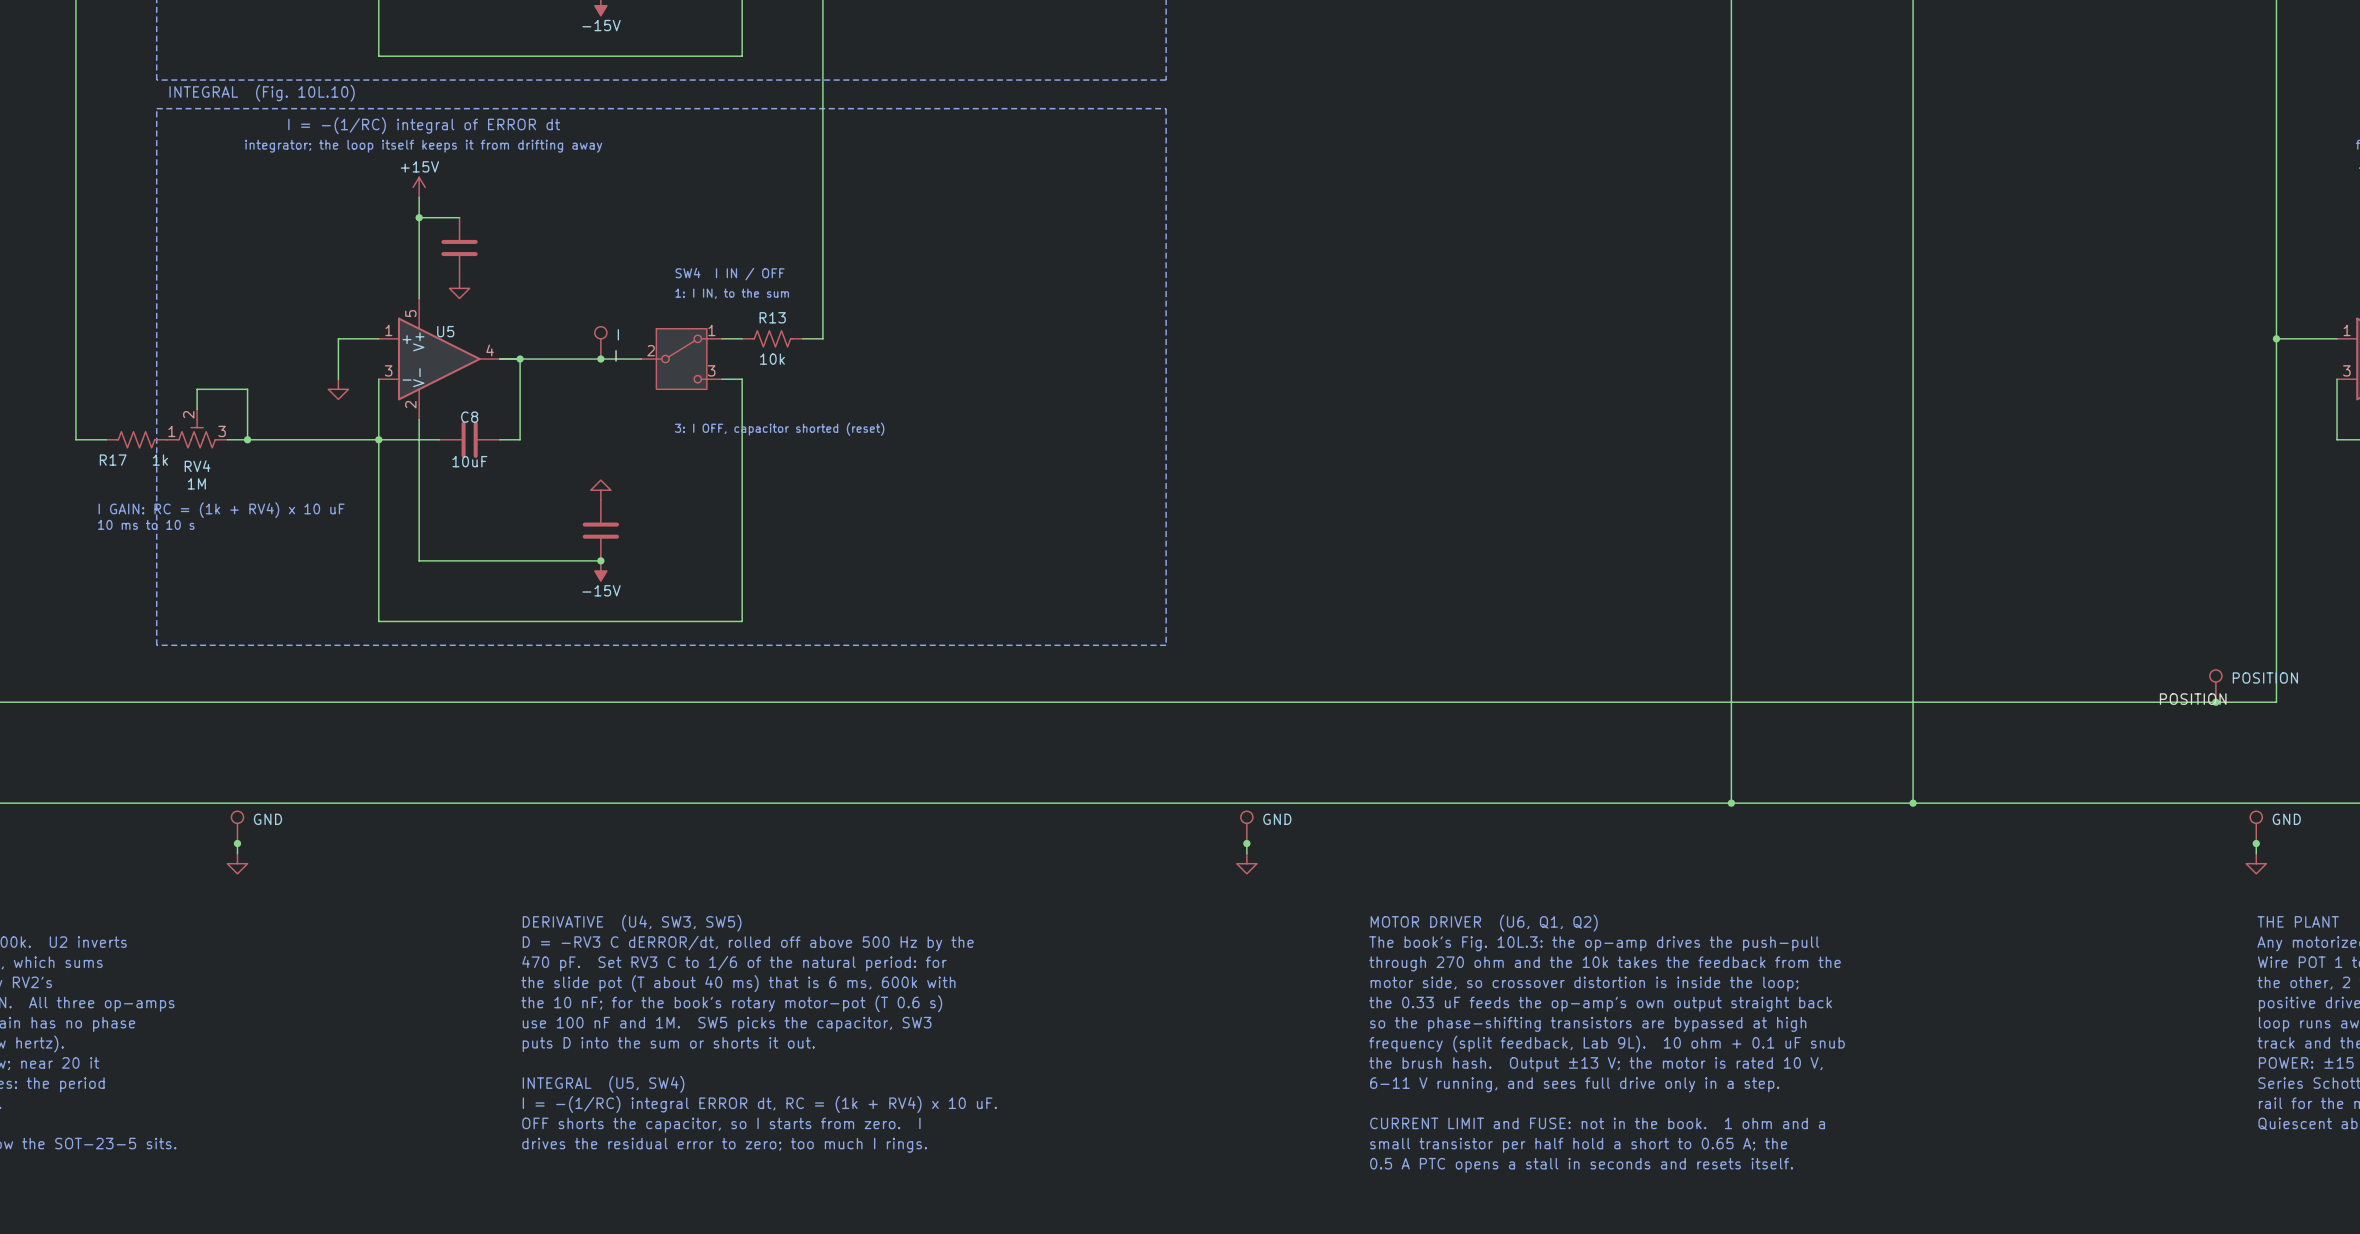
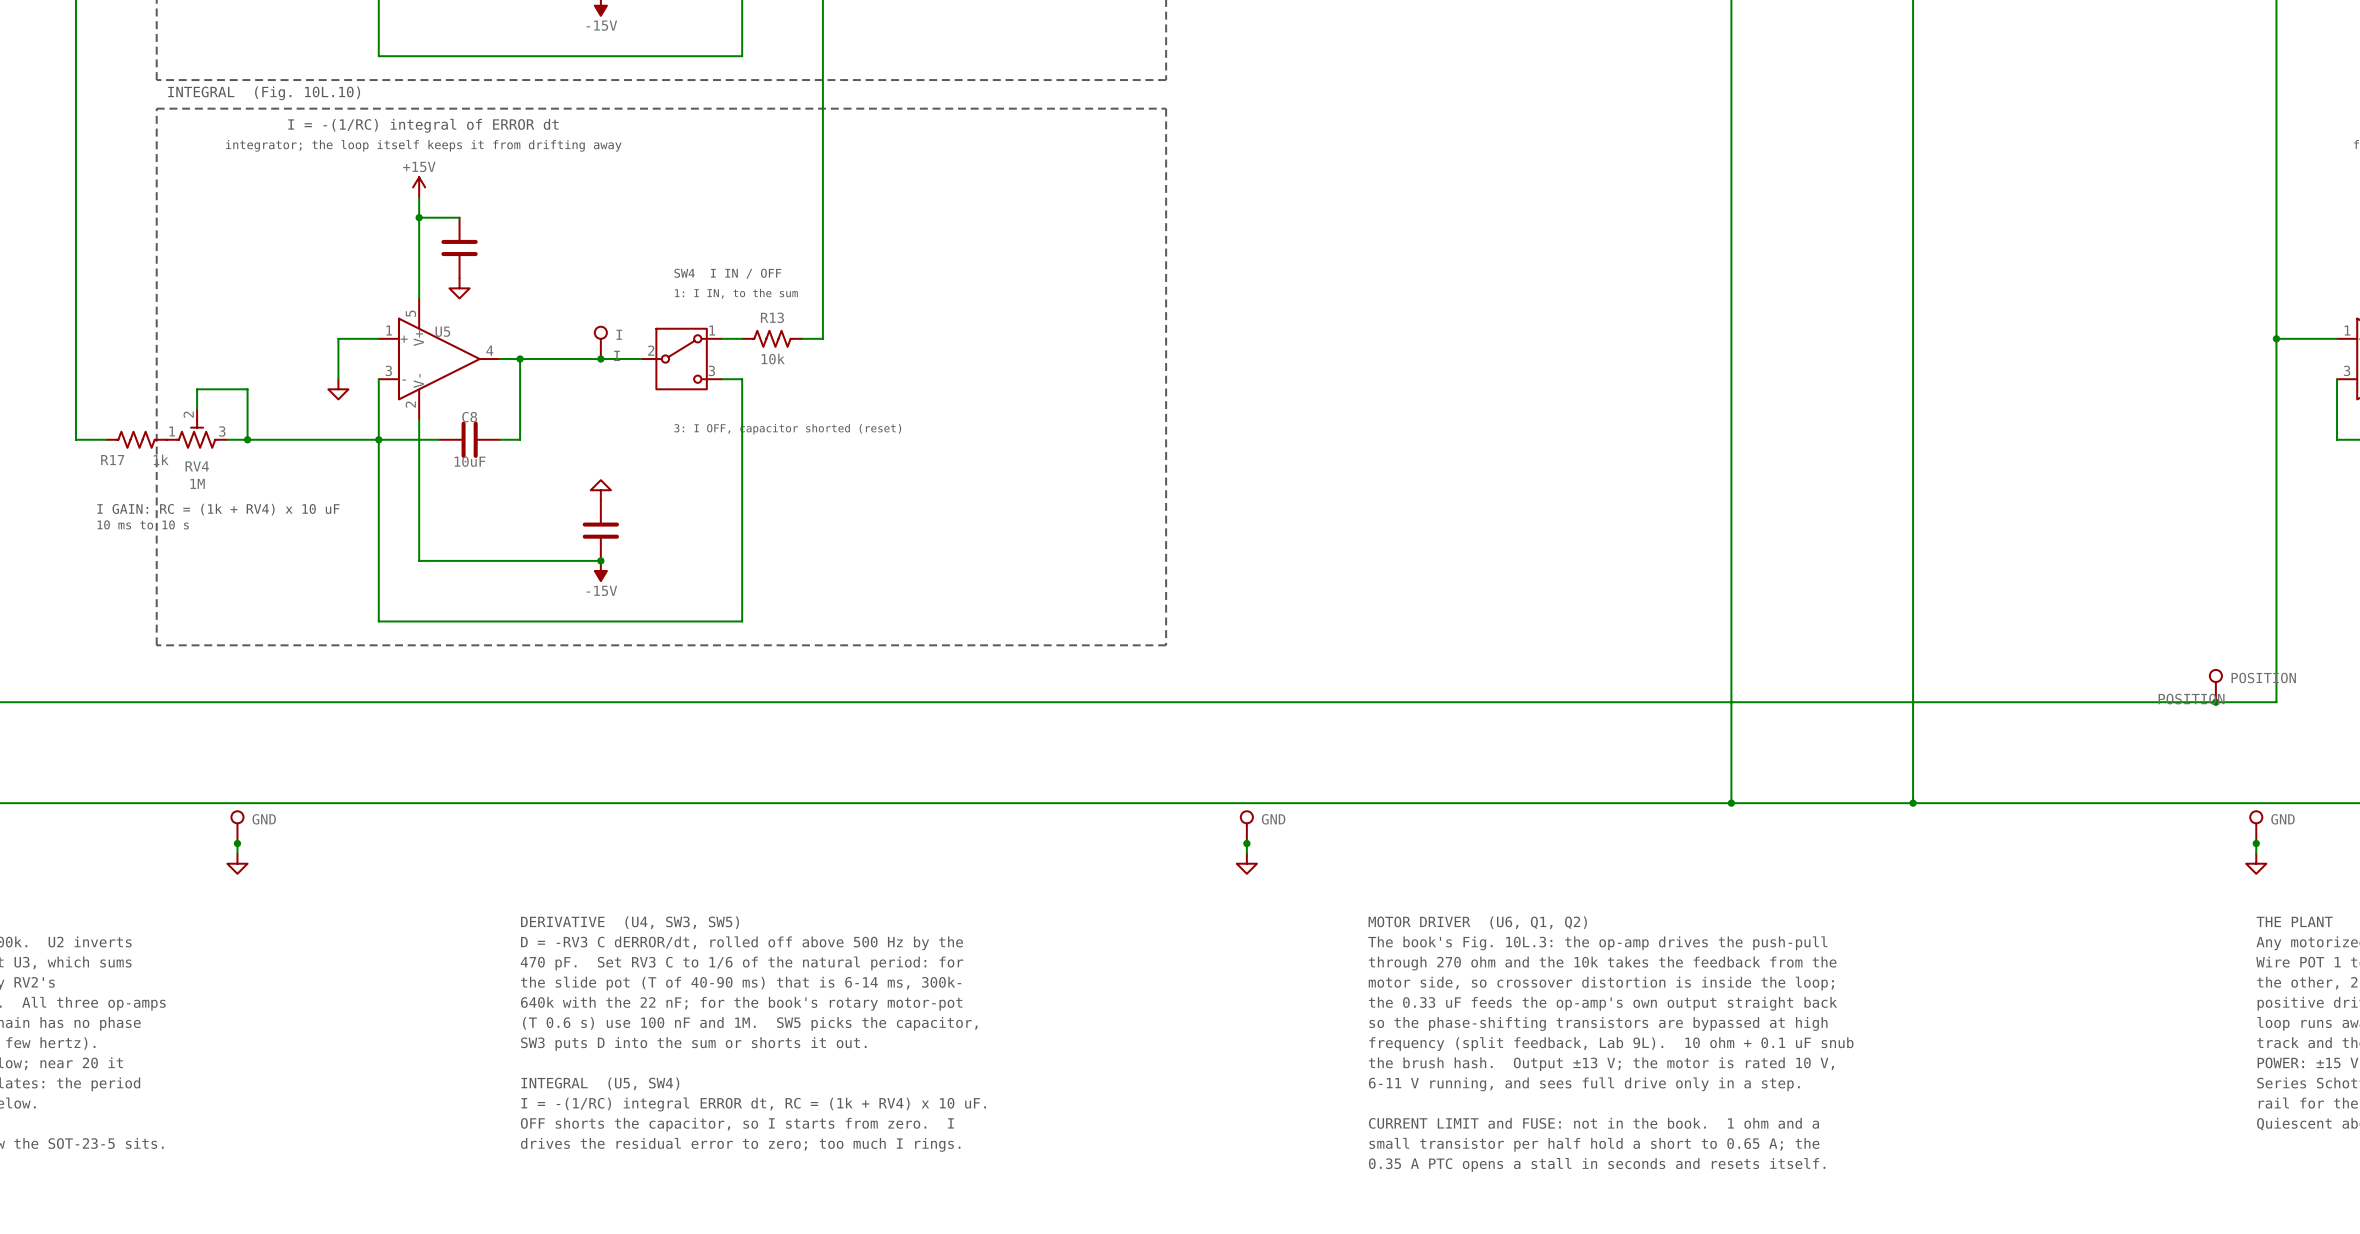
text: the slide pot (T about 40 ms) that is 6 ms, 600k with (738, 983) -> the slide pot (T of 40-90 ms) that is 6-14 ms, 300k- (741, 983)
text: the 10 nF; for the book's rotary motor-pot (T 0.6 s) (731, 1003) -> 640k with the 22 nF; for the book's rotary motor-pot (741, 1003)
text: use 100 nF and 1M. SW5 picks the capacitor, SW3 (727, 1024) -> (T 0.6 s) use 100 nF and 1M. SW5 picks the capacitor, (750, 1023)
text: puts D into the sum or shorts it out. (668, 1044) -> SW3 puts D into the sum or shorts it out. (693, 1044)
text: 0.5 A PTC opens a stall in seconds and resets itself. (1581, 1165) -> 0.35 A PTC opens a stall in seconds and resets itself. (1597, 1164)

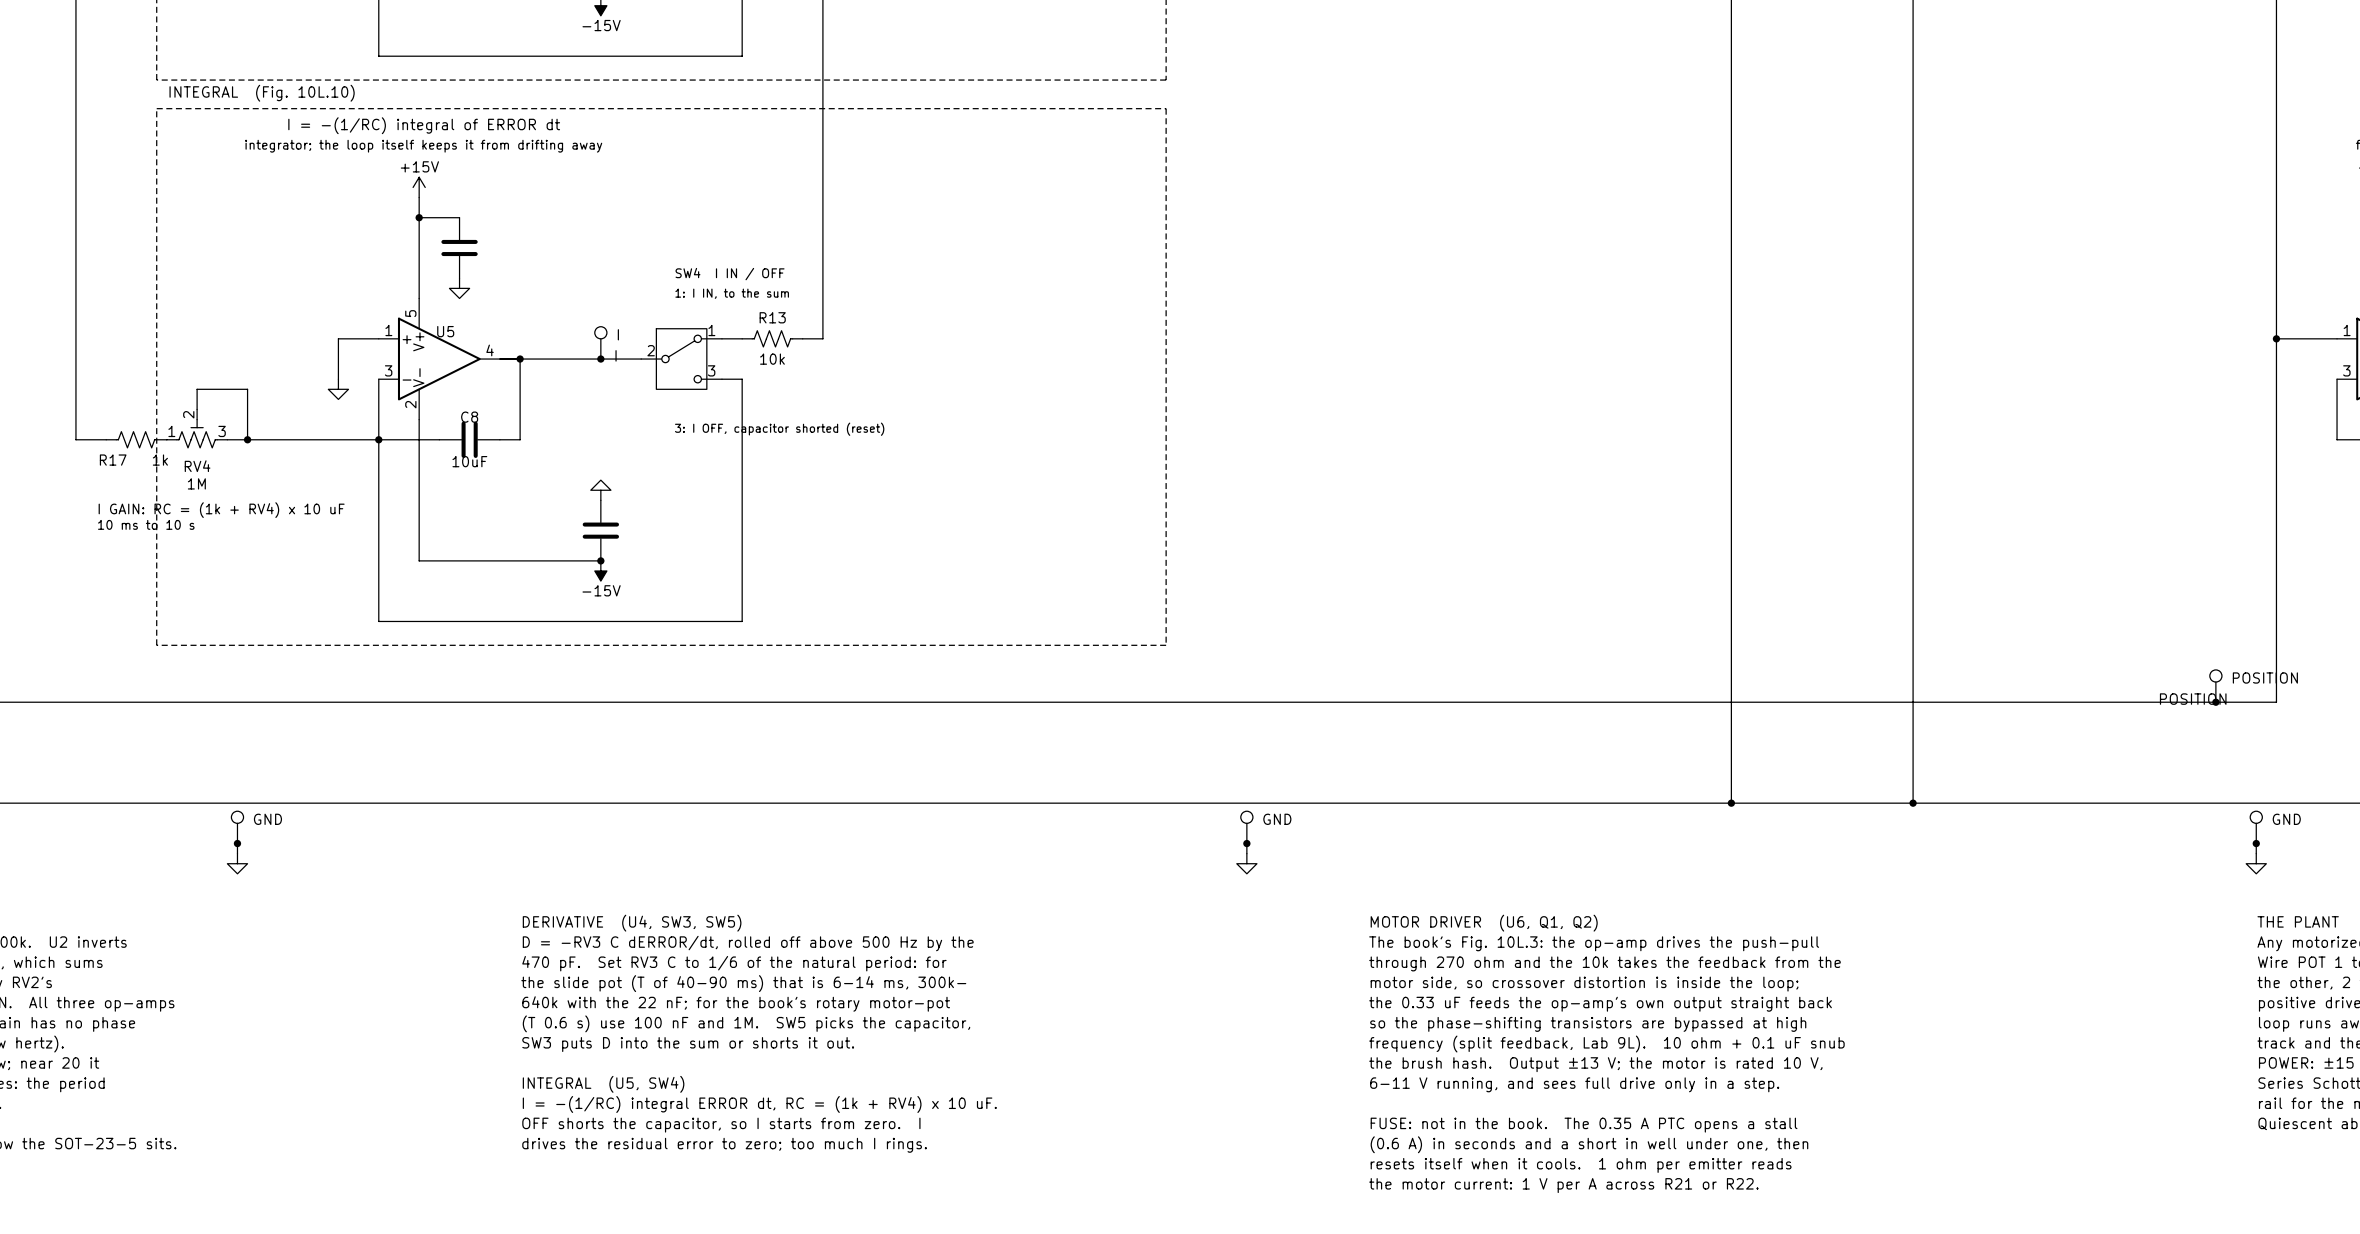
text: CURRENT LIMIT and FUSE: not in the book. 1 ohm and a (1593, 1123) -> FUSE: not in the book. The 0.35 A PTC opens a stall (1584, 1125)
text: small transistor per half hold a short to 0.65 A; the (1594, 1144) -> (0.6 A) in seconds and a short in well under one, then (1589, 1144)
text: 0.35 A PTC opens a stall in seconds and resets itself. (1597, 1164) -> resets itself when it cools. 1 ohm per emitter reads (1581, 1165)
text: none -> the motor current: 1 V per A across R21 or R22. (1563, 1185)

